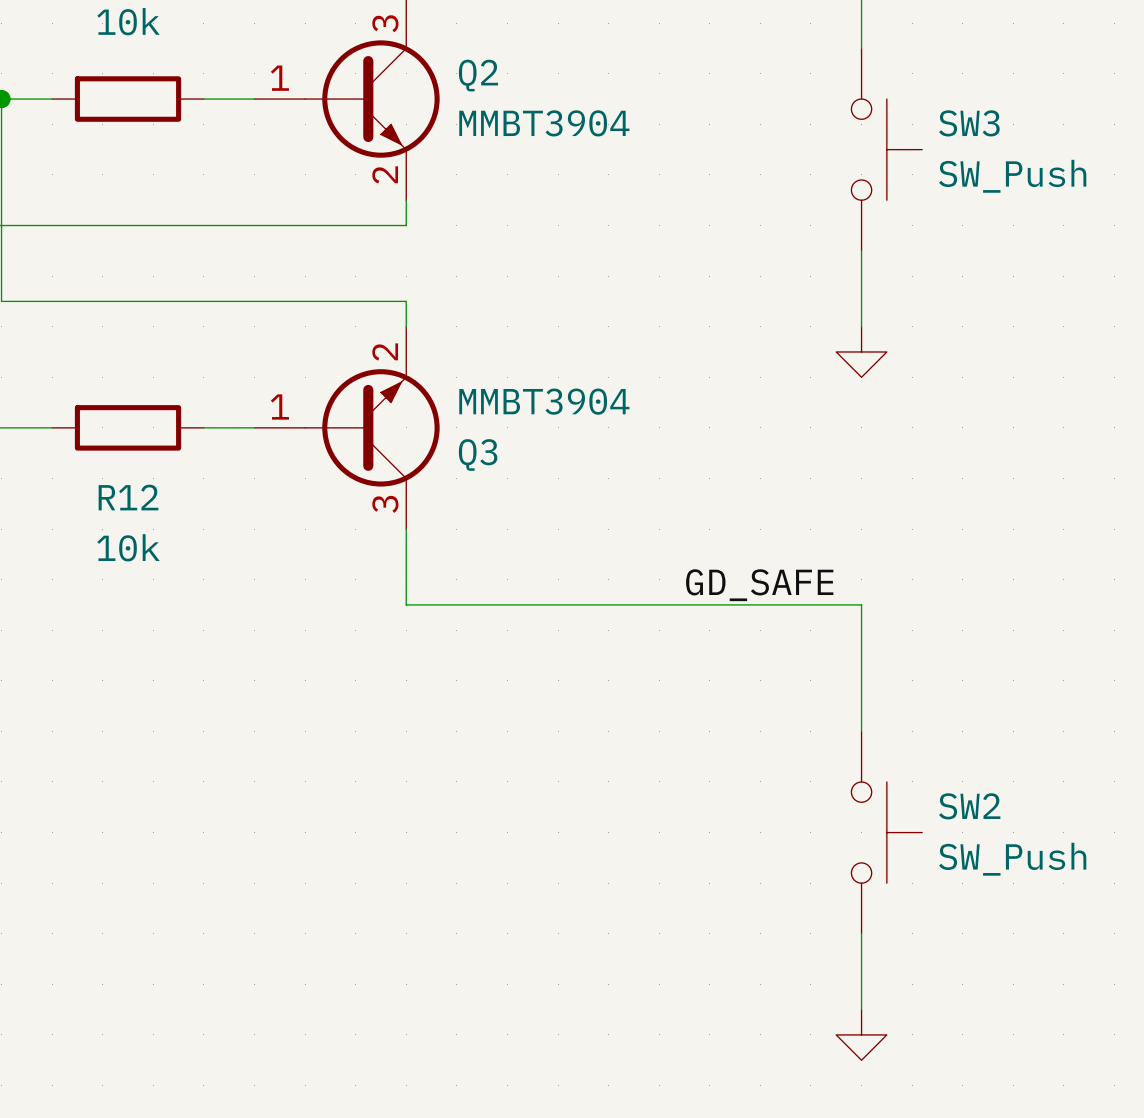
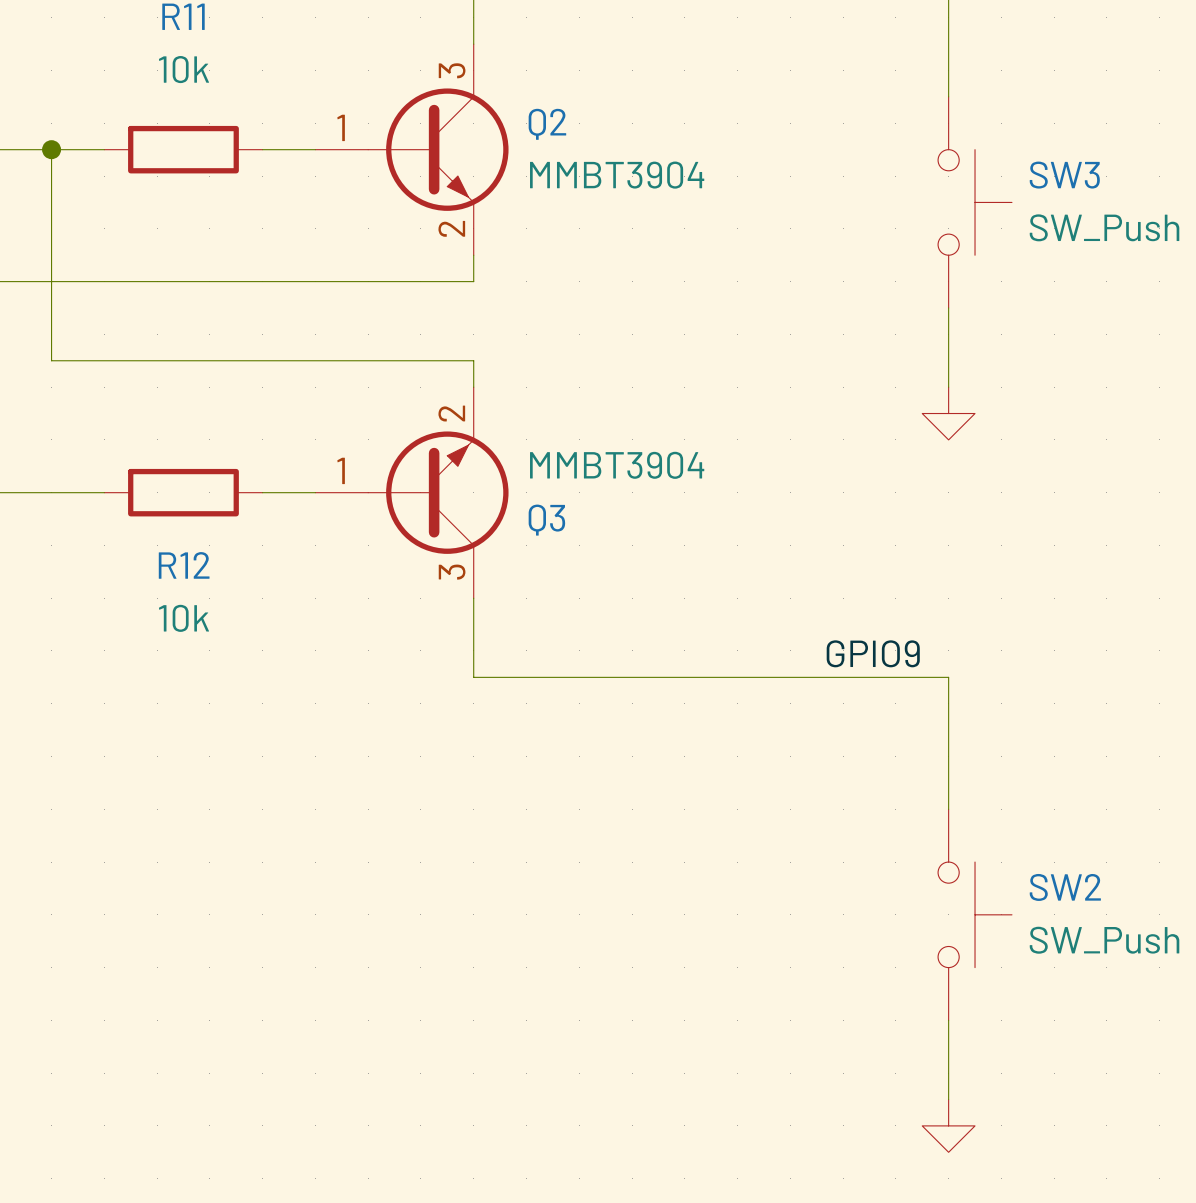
label: GD_SAFE (759, 585) -> GPIO9 (873, 653)

